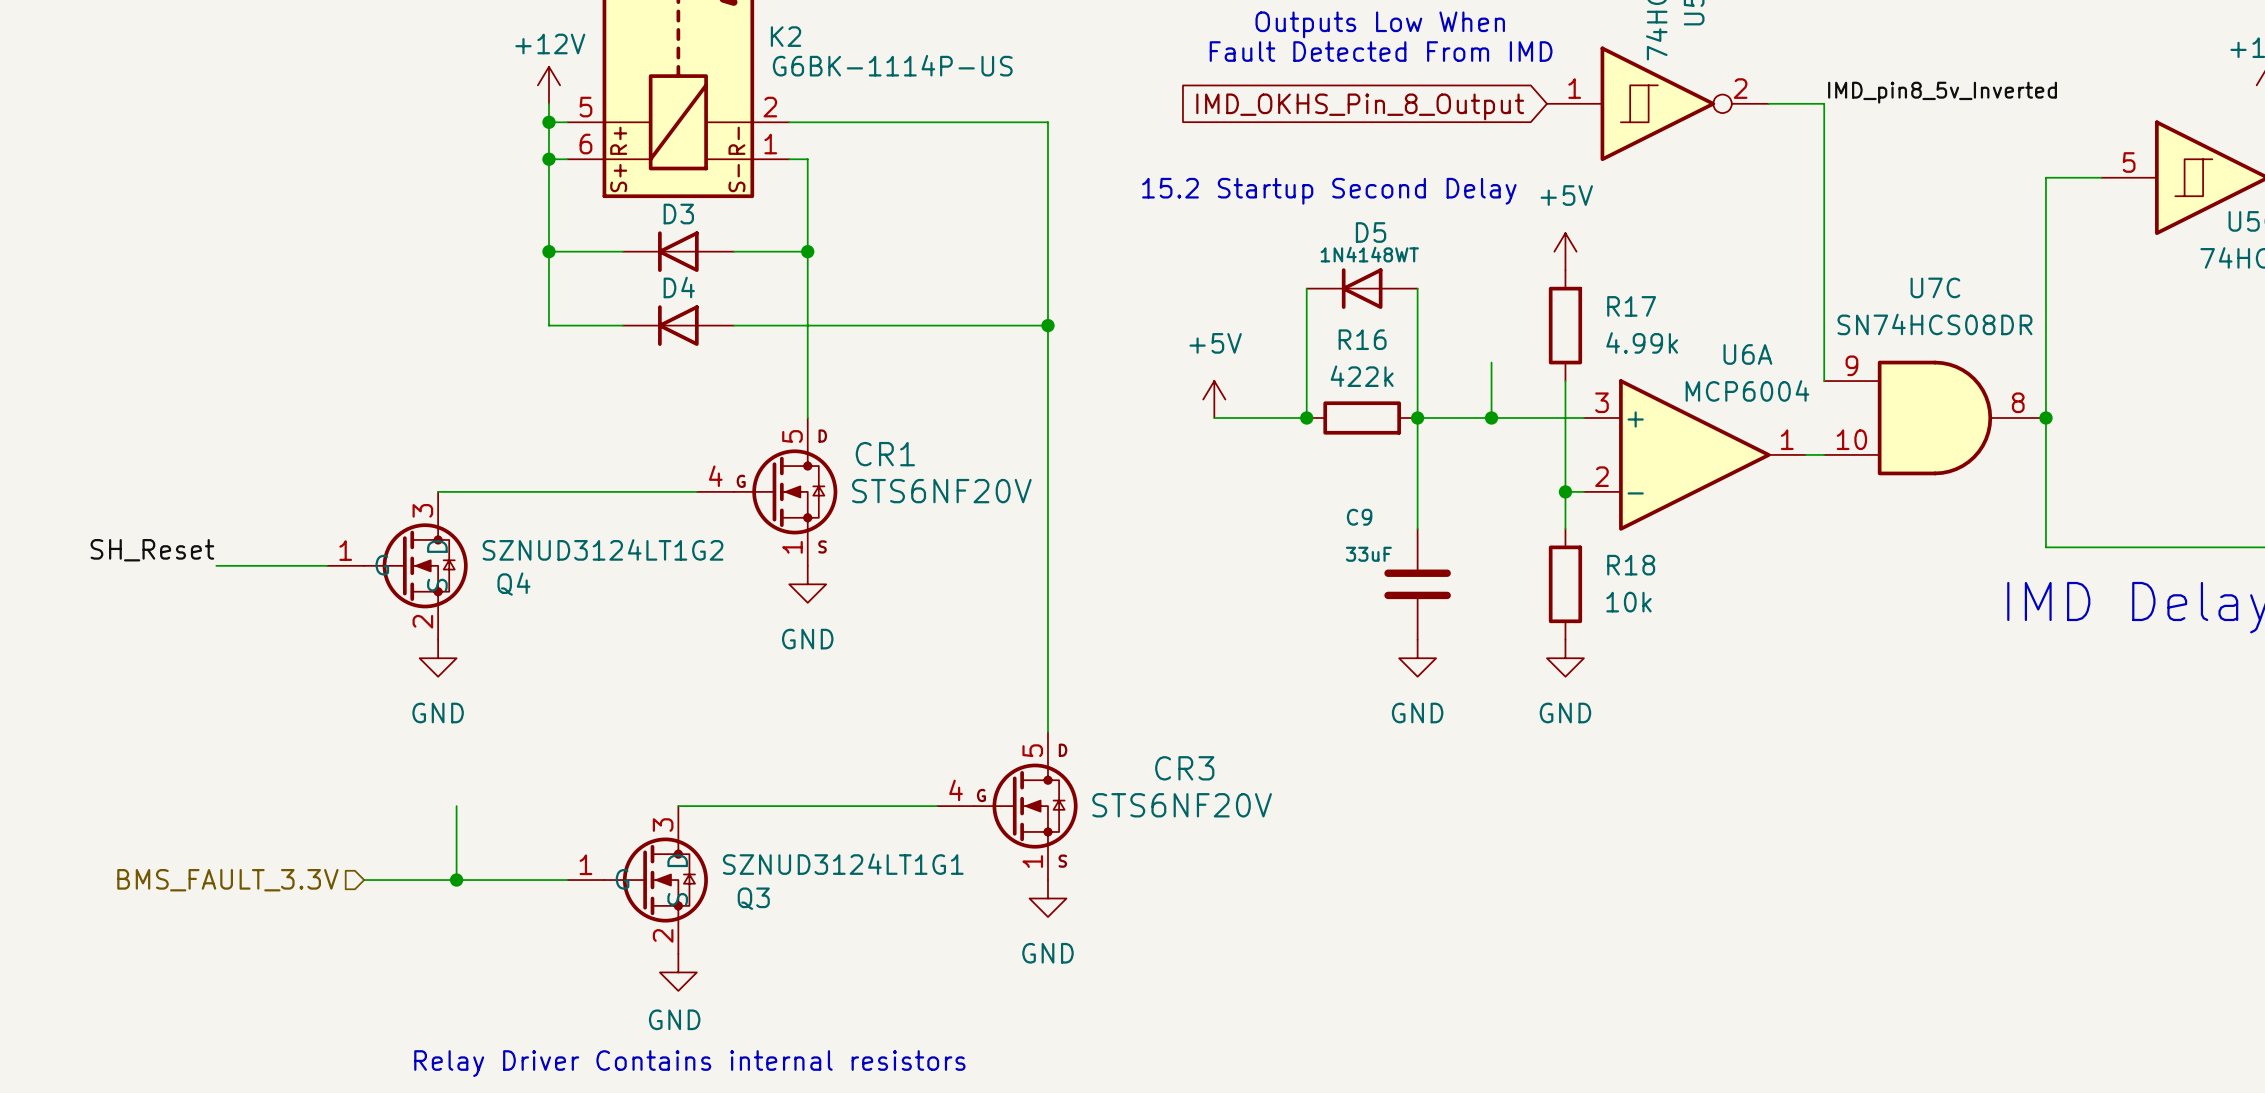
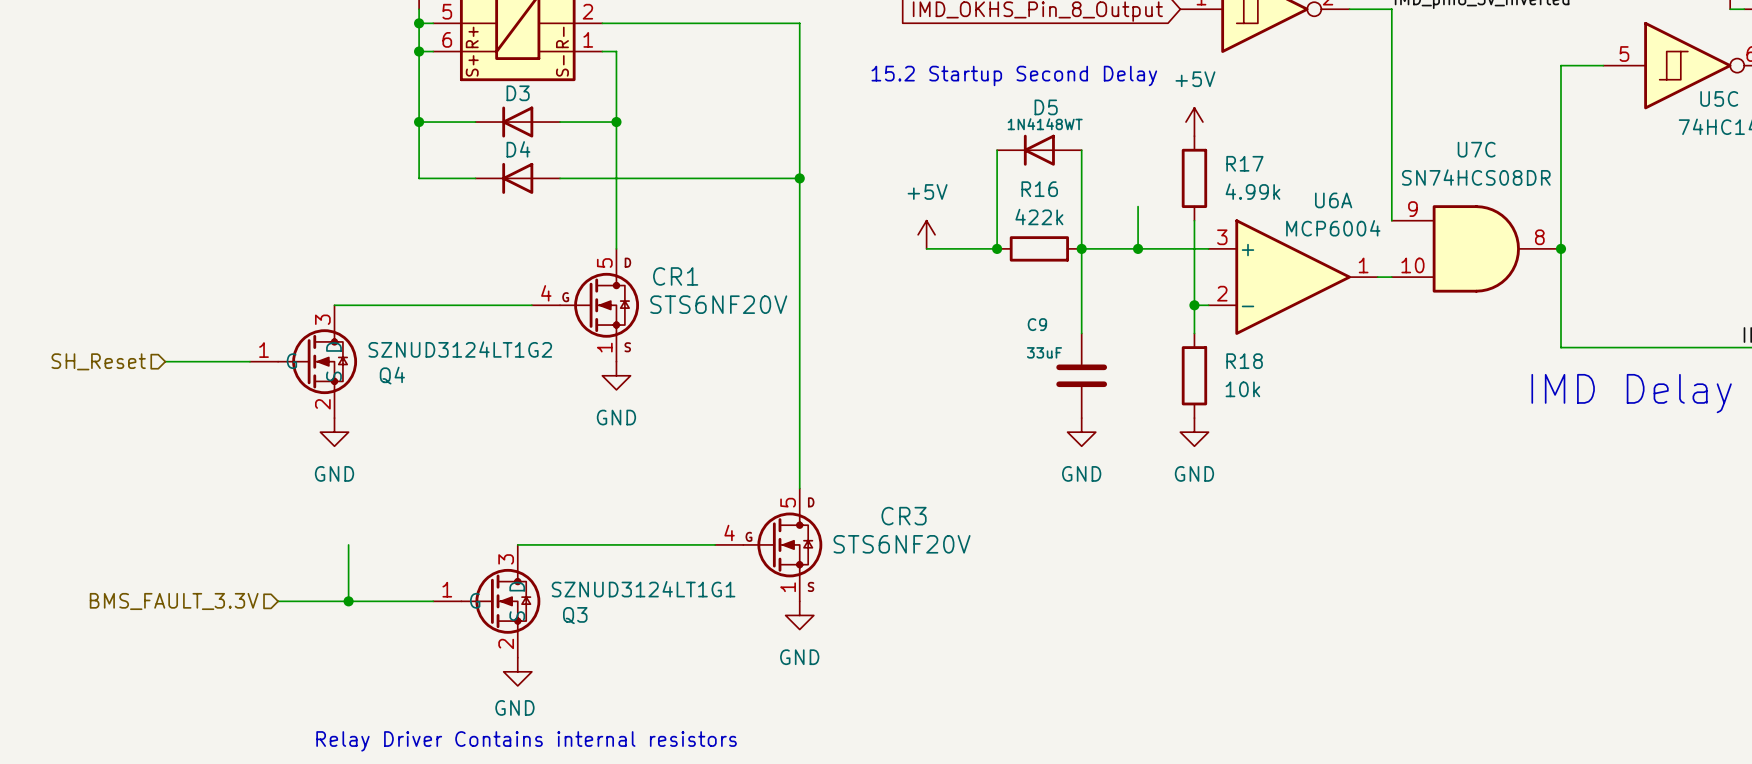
label: SH_Reset (152, 550) -> none
hierarchical label: none -> SH_Reset (98, 361)

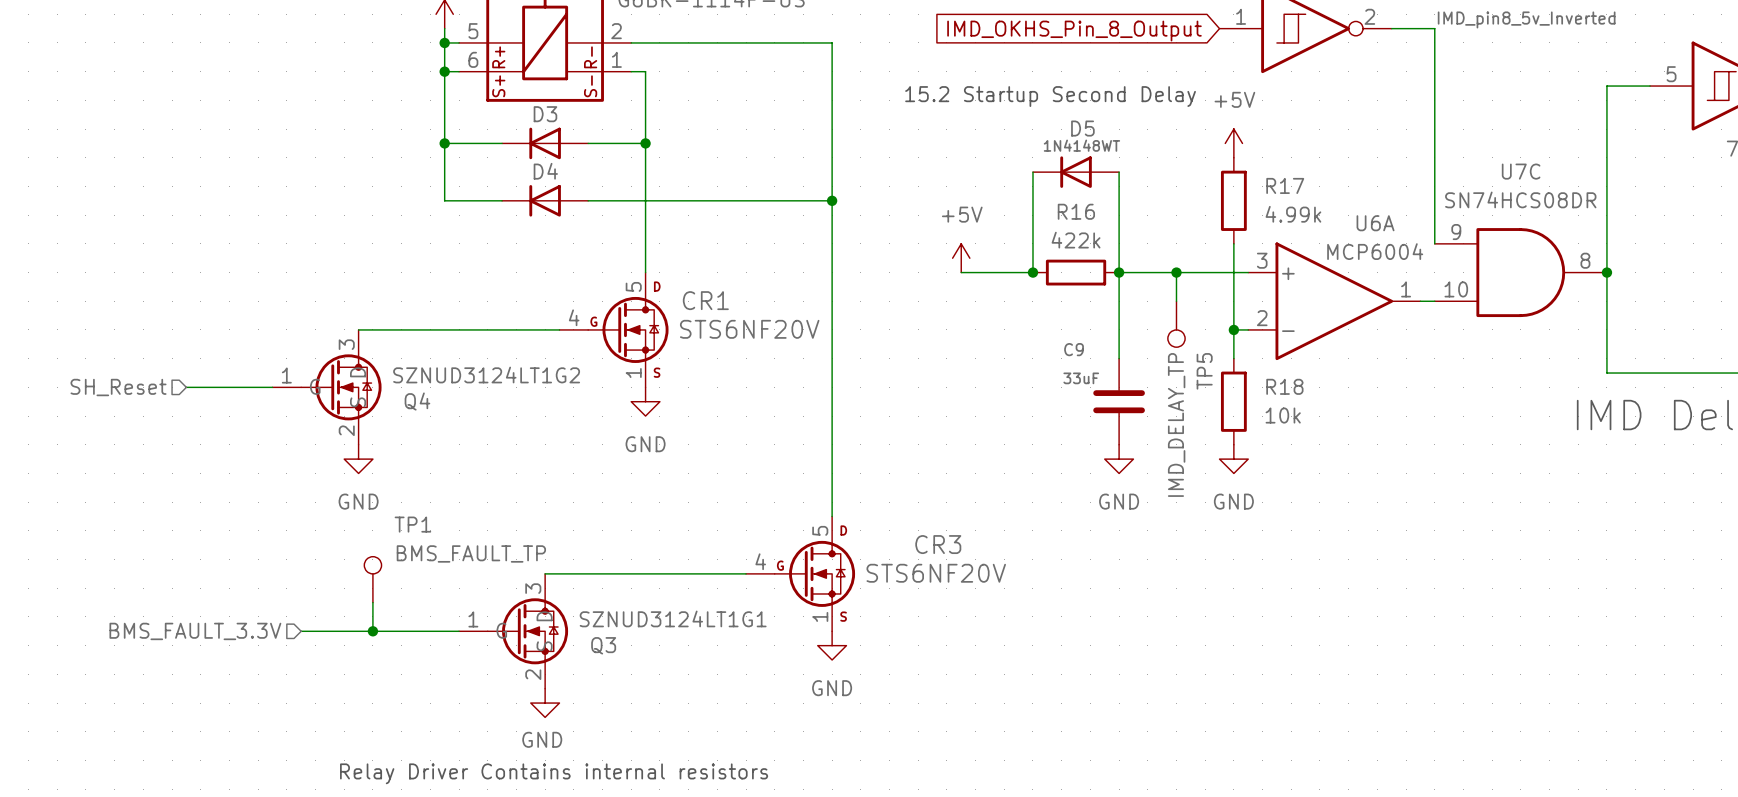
wire: (1138, 206) (1138, 248) -> (1176, 301) (1176, 272)
TP5: none -> IMD_DELAY_TP (1176, 324)
TP1: none -> BMS_FAULT_TP (372, 579)

